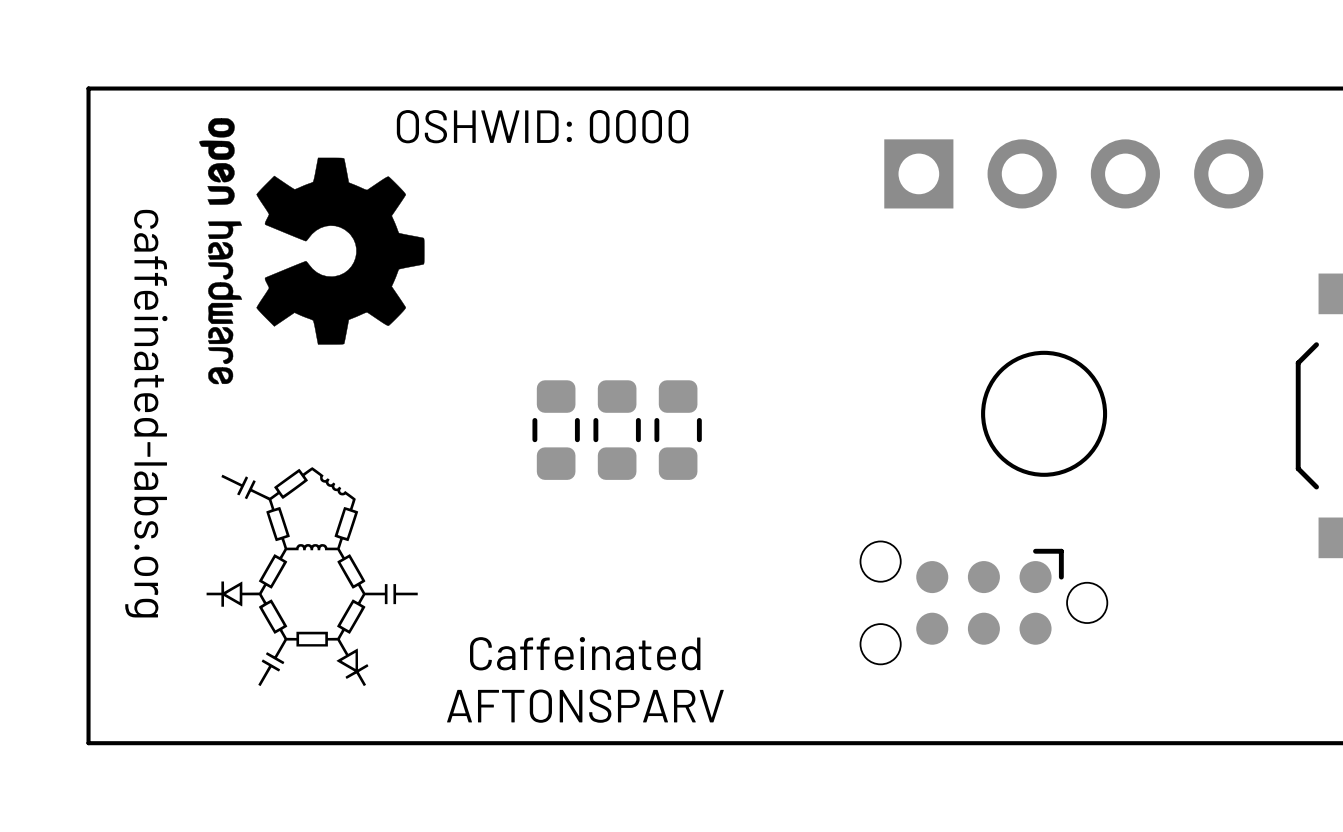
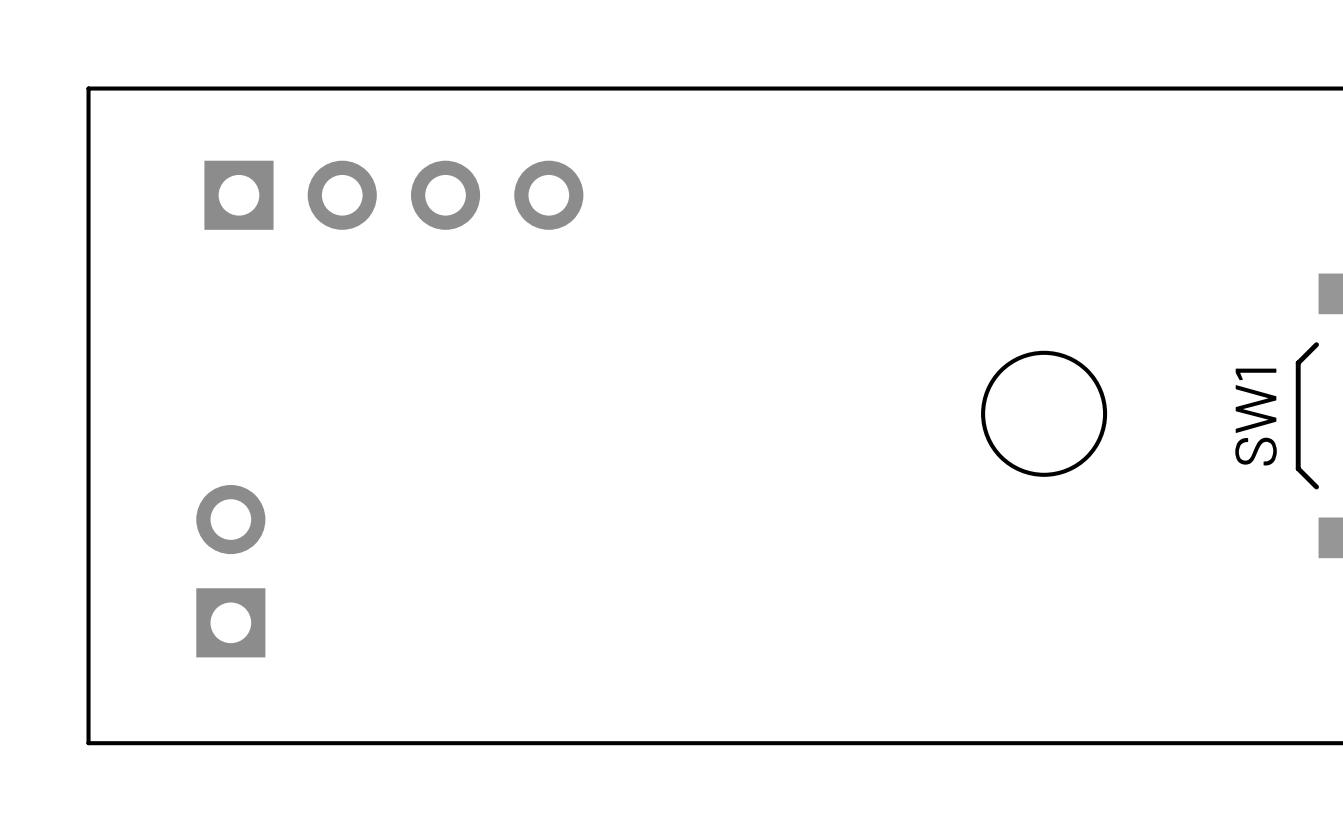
drawing: [199, 118, 425, 385] -> none
text: OSHWID: 0000 (542, 126) -> none
part position: (1073, 173) -> (393, 195)
text: caffeinated-labs.org (146, 413) -> none
SW1 name: none -> SW1 (1256, 417)
part: (556, 430) -> none
part: (617, 430) -> none
part: (678, 430) -> none
drawing: [206, 467, 418, 687] -> none
part: none -> (230, 571)
part: (983, 602) -> none
text: Caffeinated (585, 653) -> none
text: AFTONSPARV (585, 706) -> none

